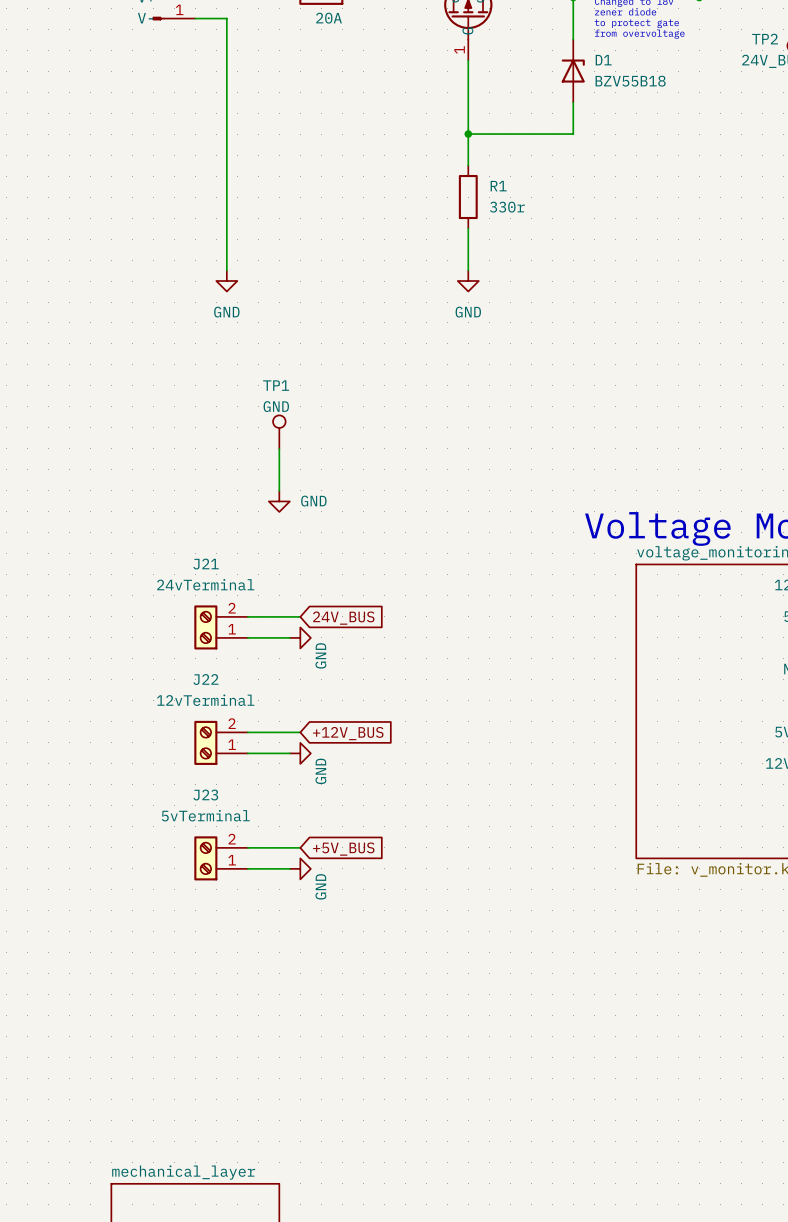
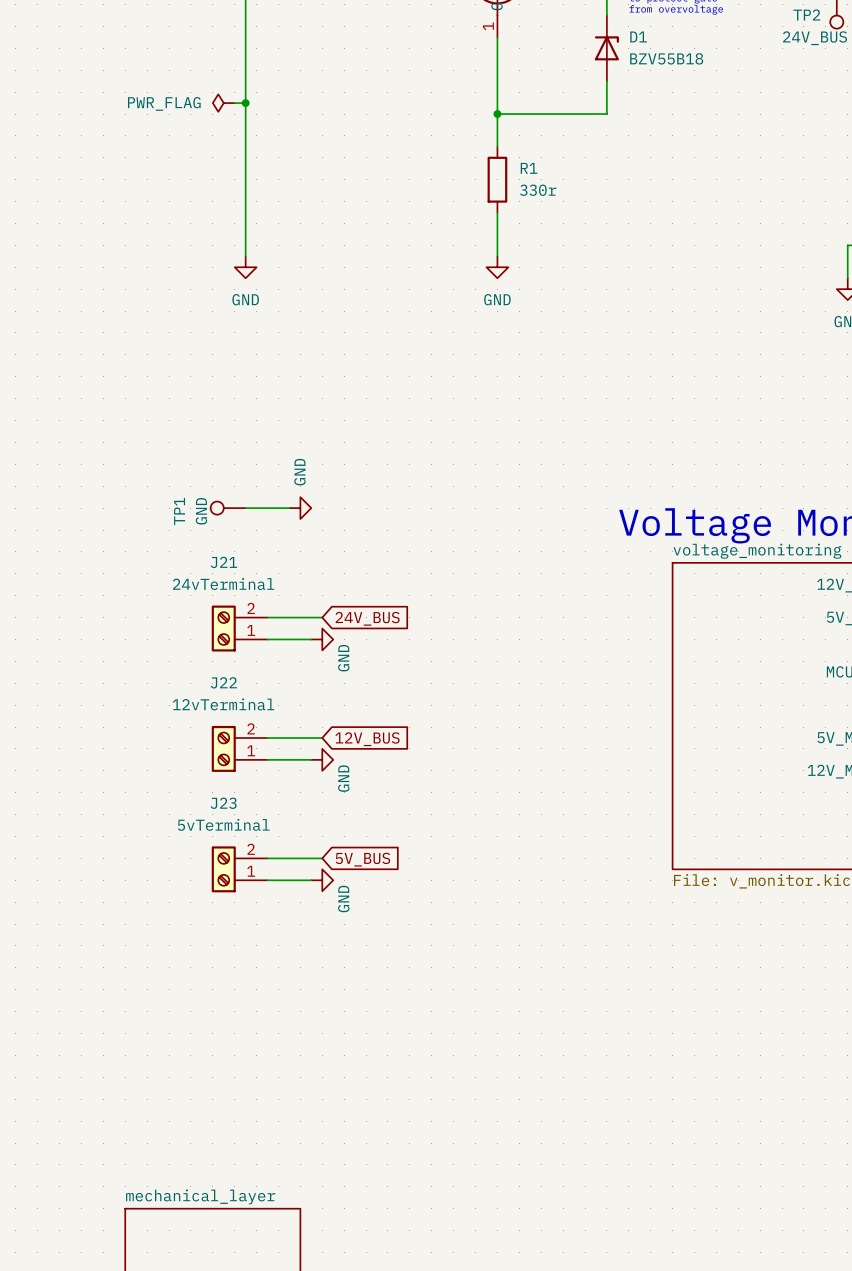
power symbol: none -> PWR_FLAG (223, 103)
wire: none -> (234, 103) (245, 103)
junction: none -> (245, 103)
TP1 rotation: 0° (279, 421) -> 90° counterclockwise (217, 508)
TP1 position: (279, 432) -> (228, 508)
wire: (279, 448) (279, 490) -> none
power symbol rotation: 0° (279, 501) -> 90° counterclockwise (300, 508)
wire: none -> (245, 508) (289, 508)
global label: +12V_BUS (348, 733) -> 12V_BUS (367, 739)
global label: +5V_BUS (343, 849) -> 5V_BUS (362, 859)

